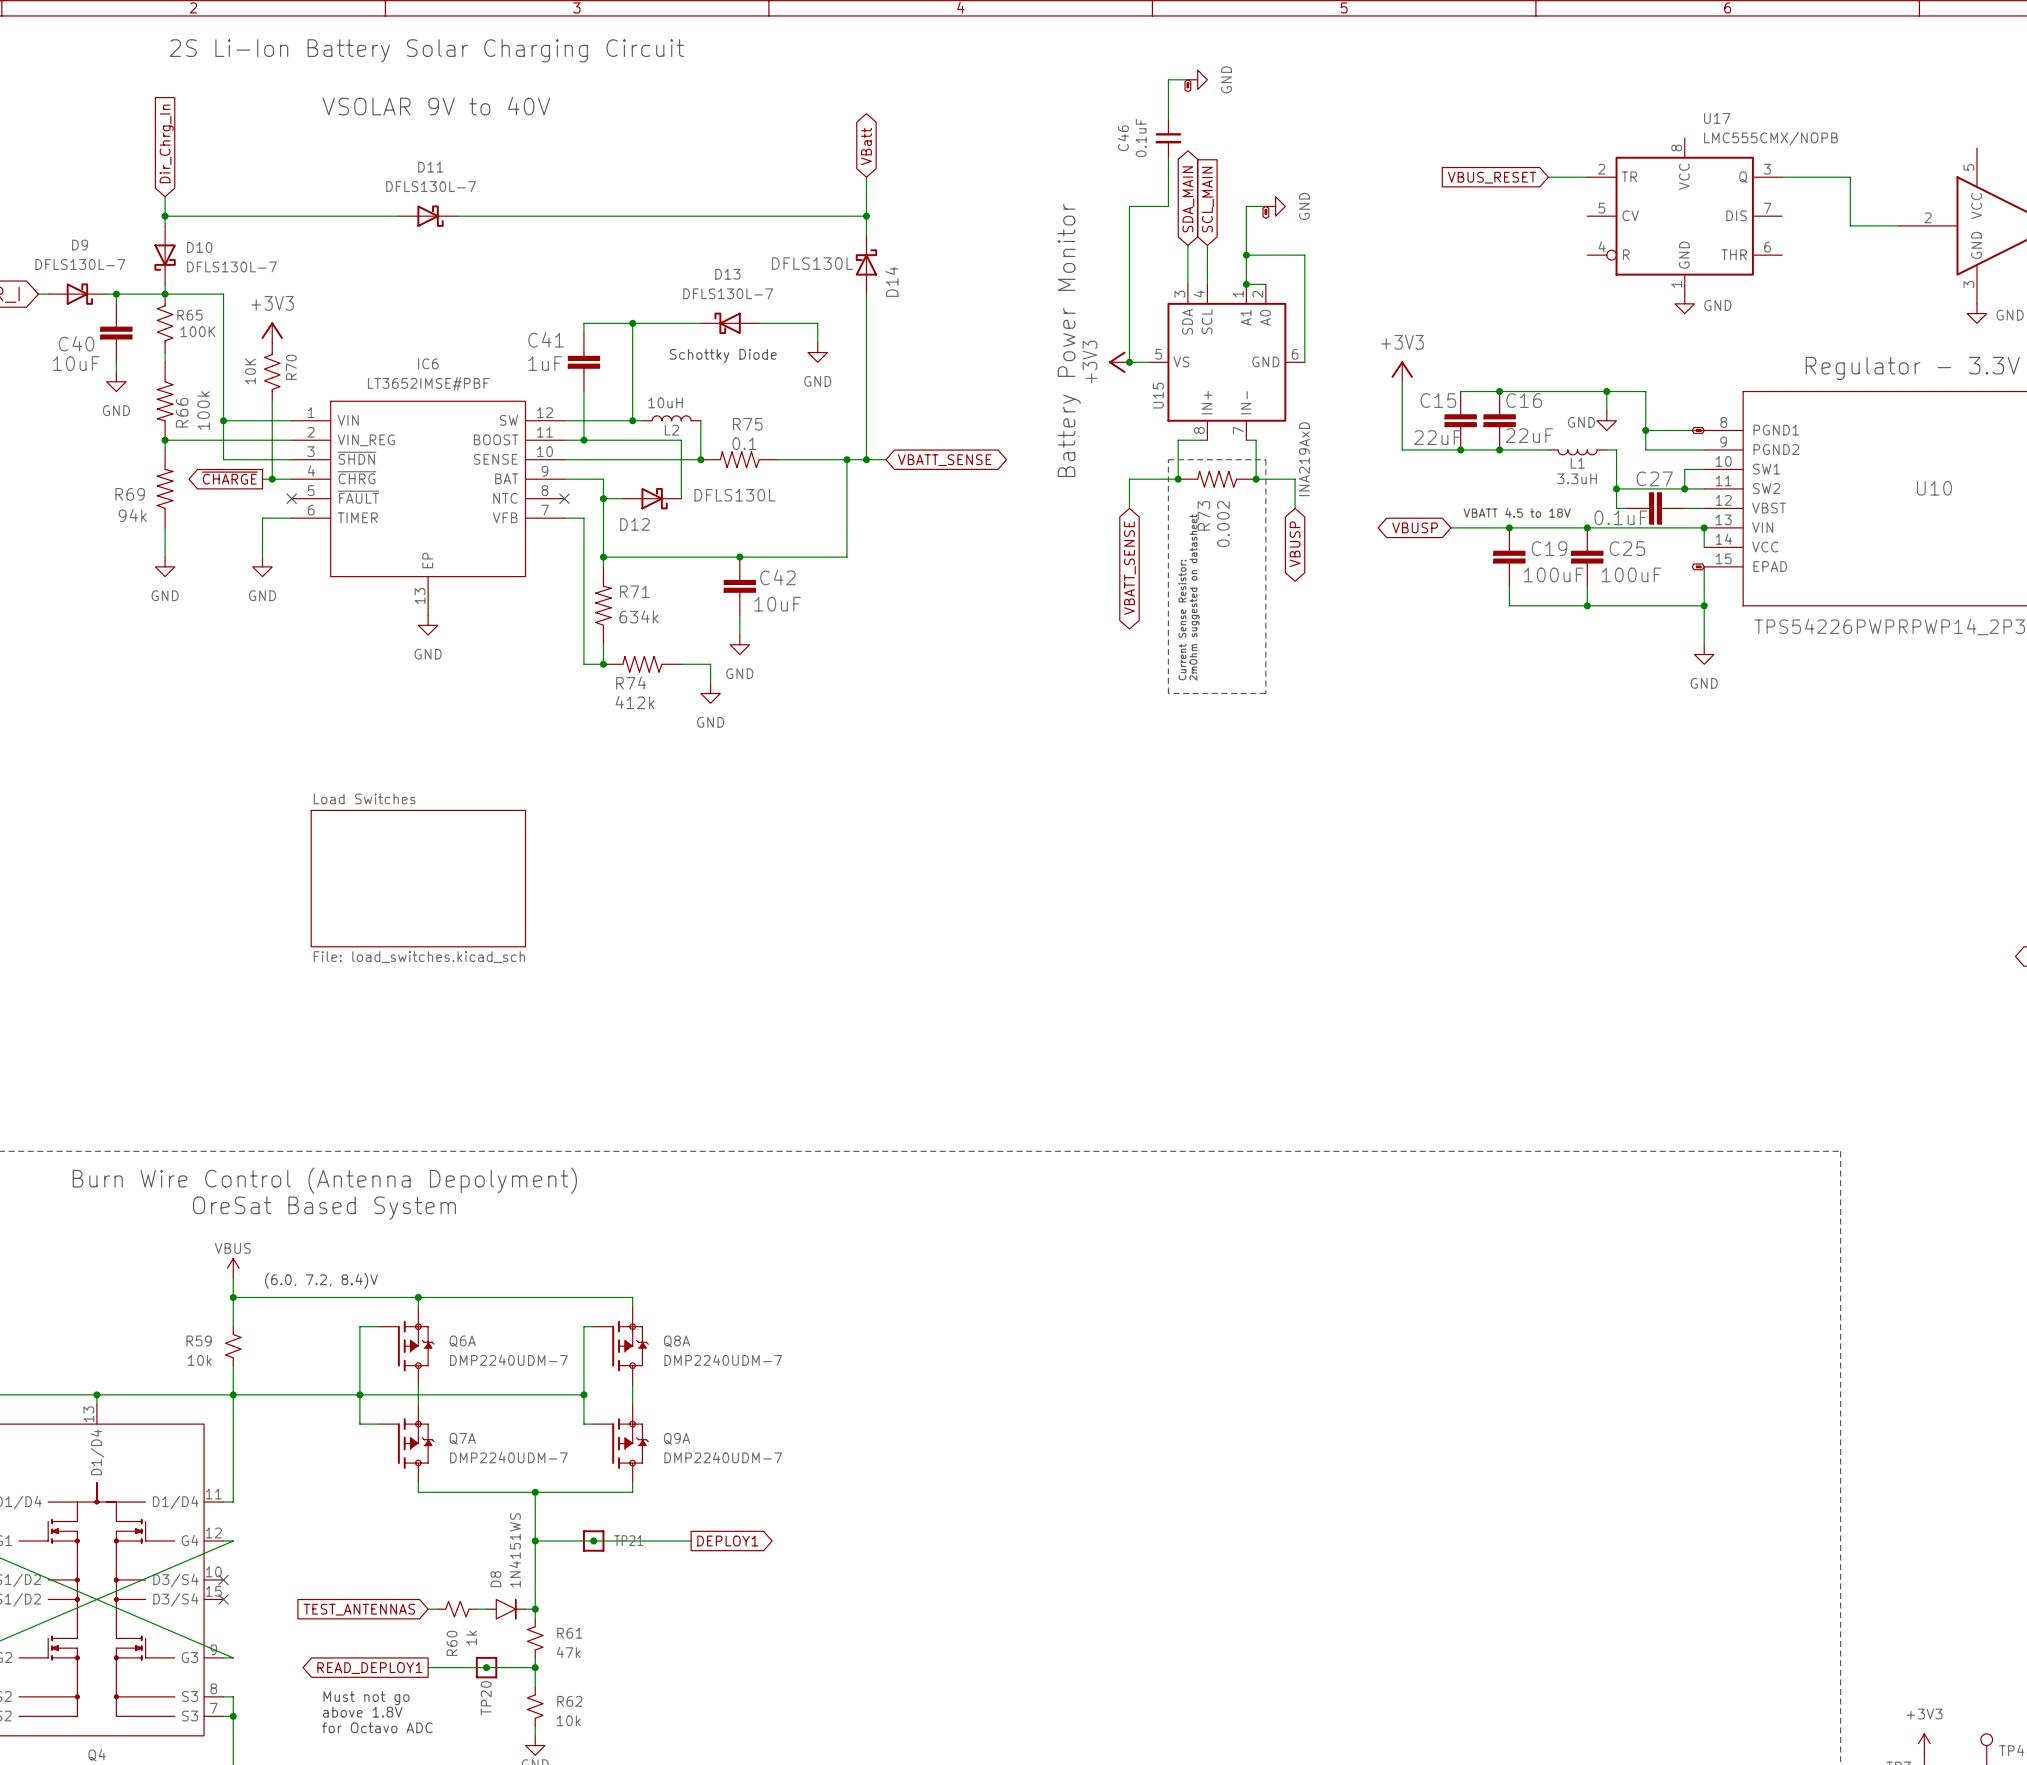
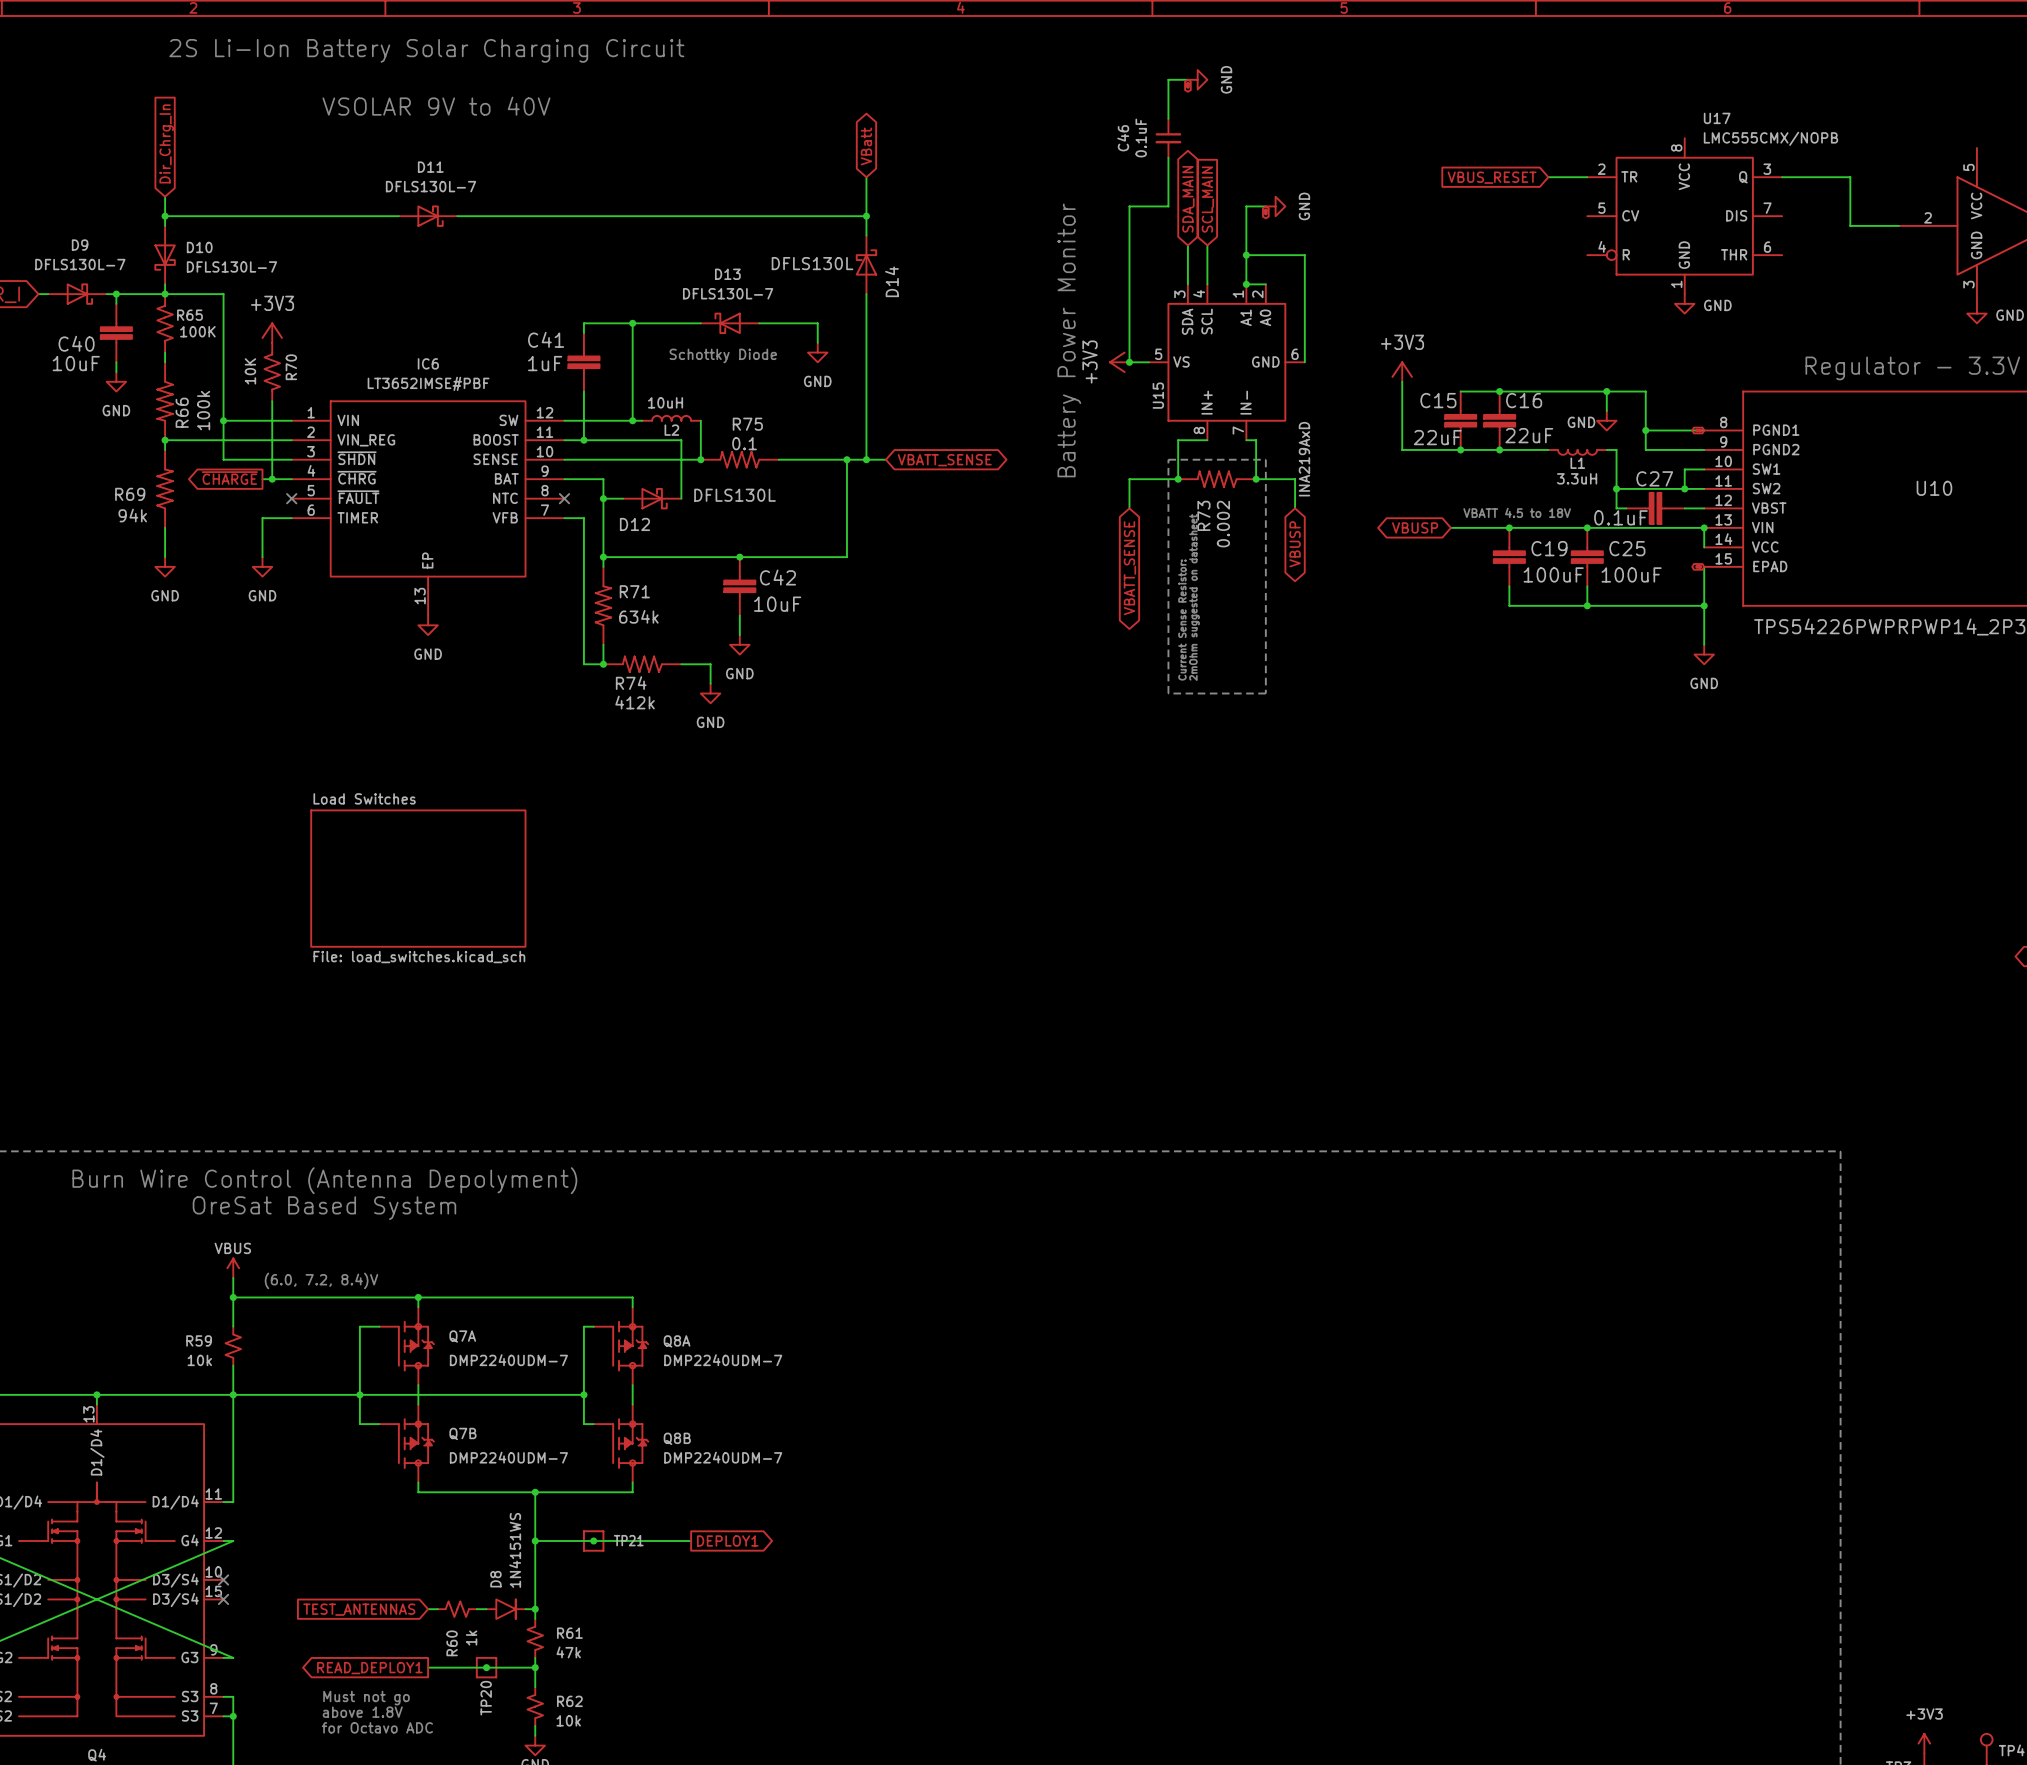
Q6A name: Q6A (462, 1341) -> Q7A (462, 1336)
Q7A name: Q7A (462, 1438) -> Q7B (462, 1433)
Q9A name: Q9A (677, 1438) -> Q8B (677, 1438)

